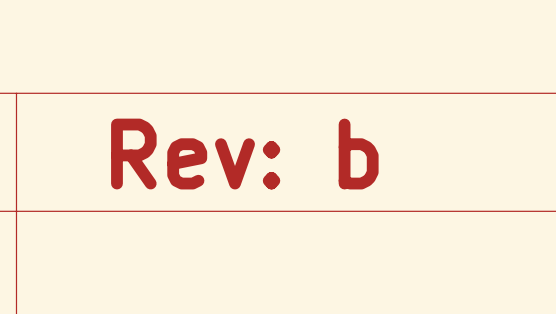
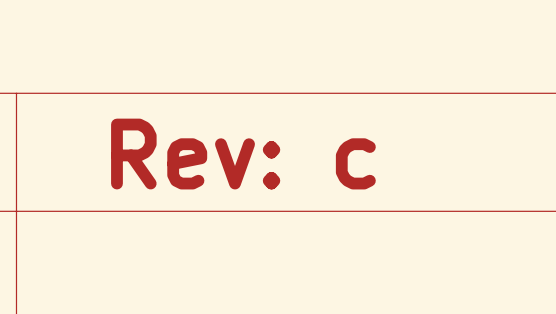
title block: Rev: b (244, 154) -> Rev: c (243, 154)

